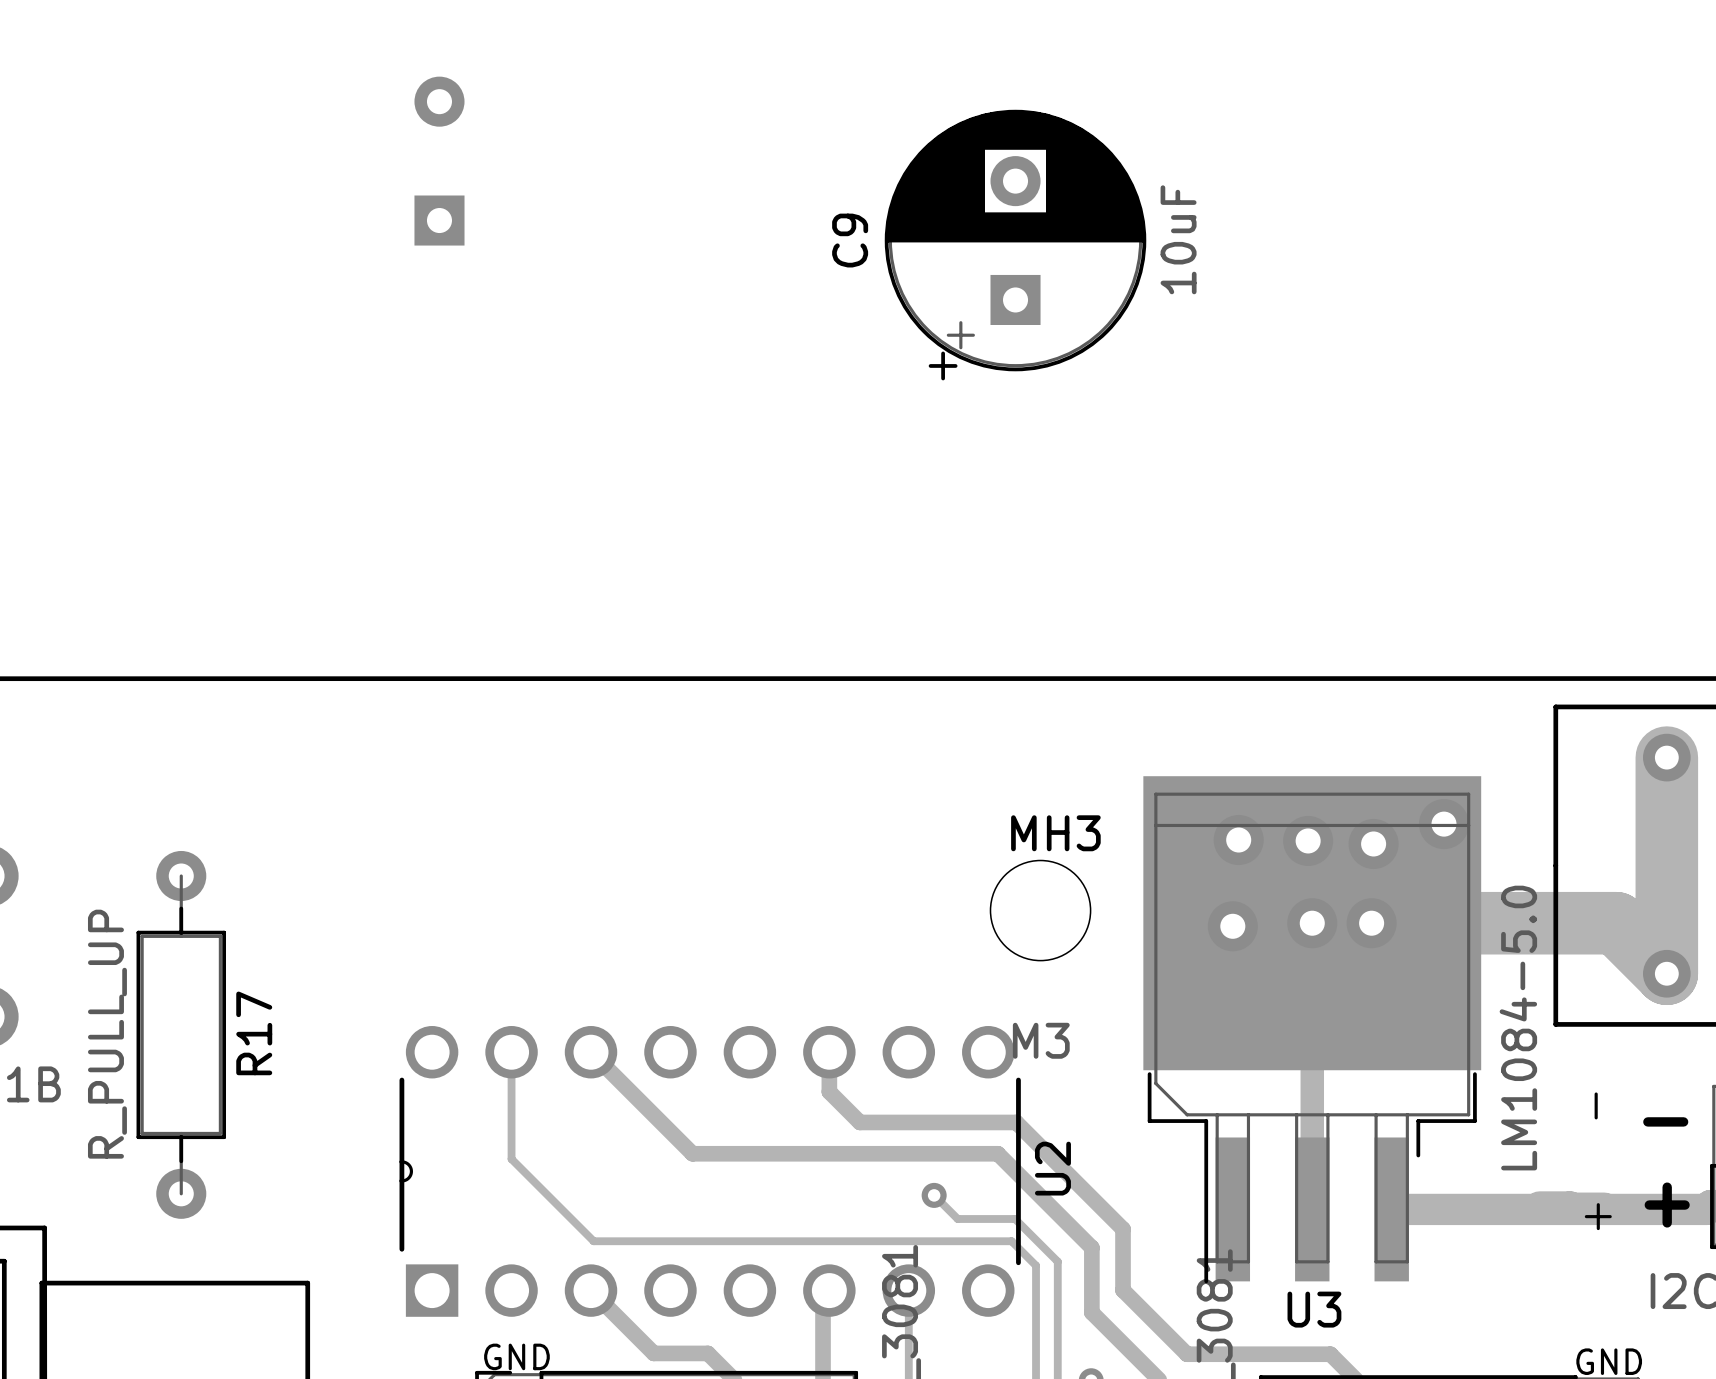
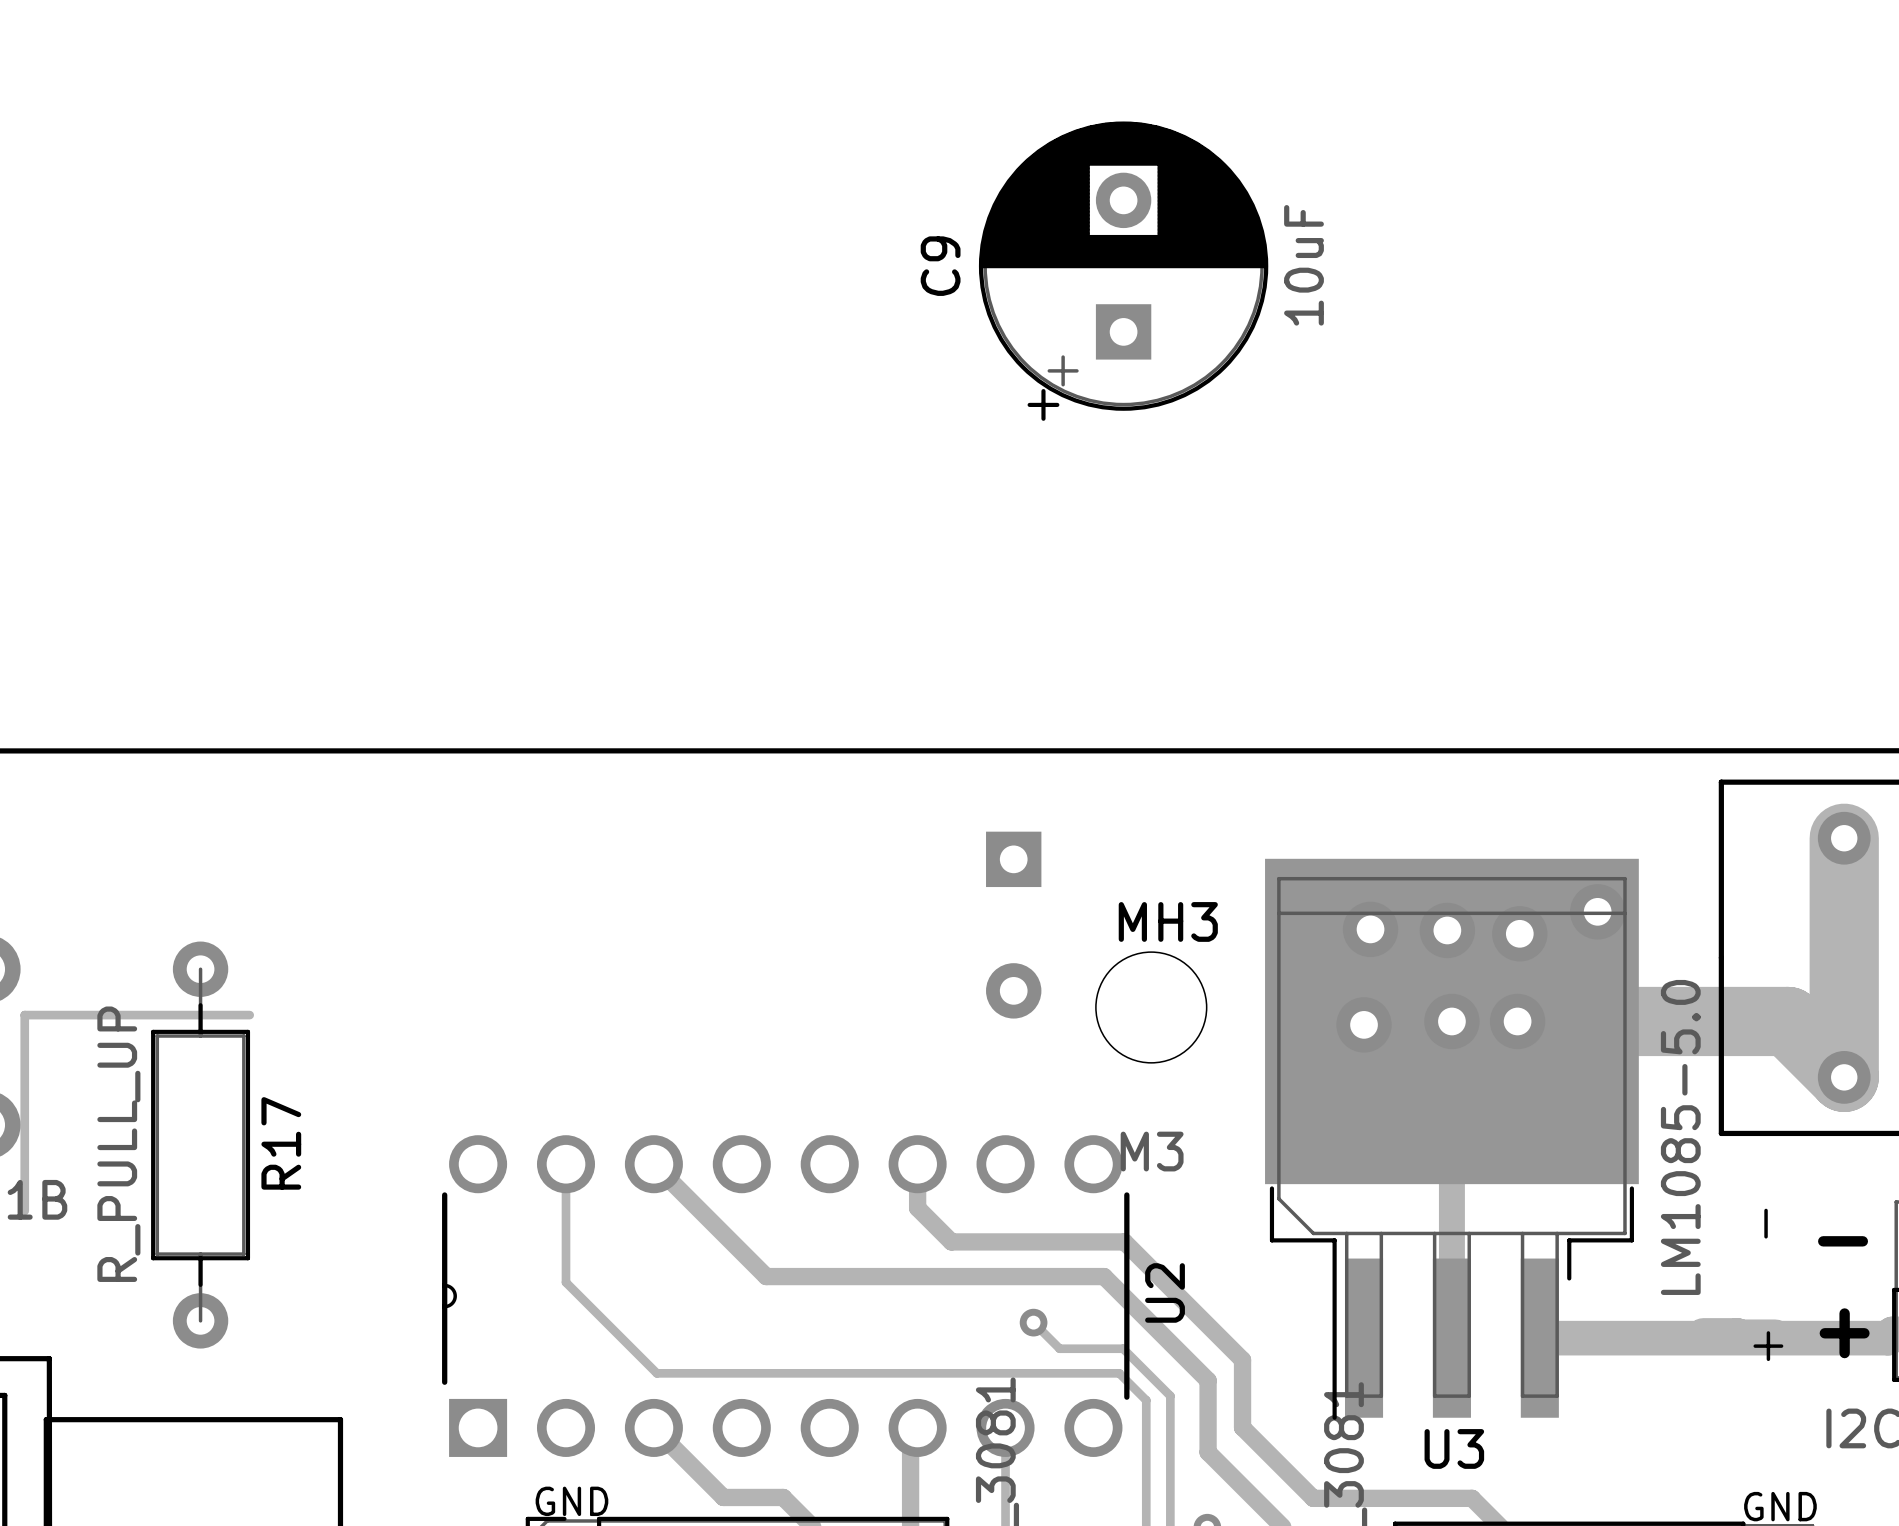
part: (439, 161) -> none
part: none -> (1013, 925)
track: none -> (249, 1015) (24, 1015) (24, 1210)
U3 value: LM1084-5.0 (1518, 1028) -> LM1085-5.0 (1680, 1137)

